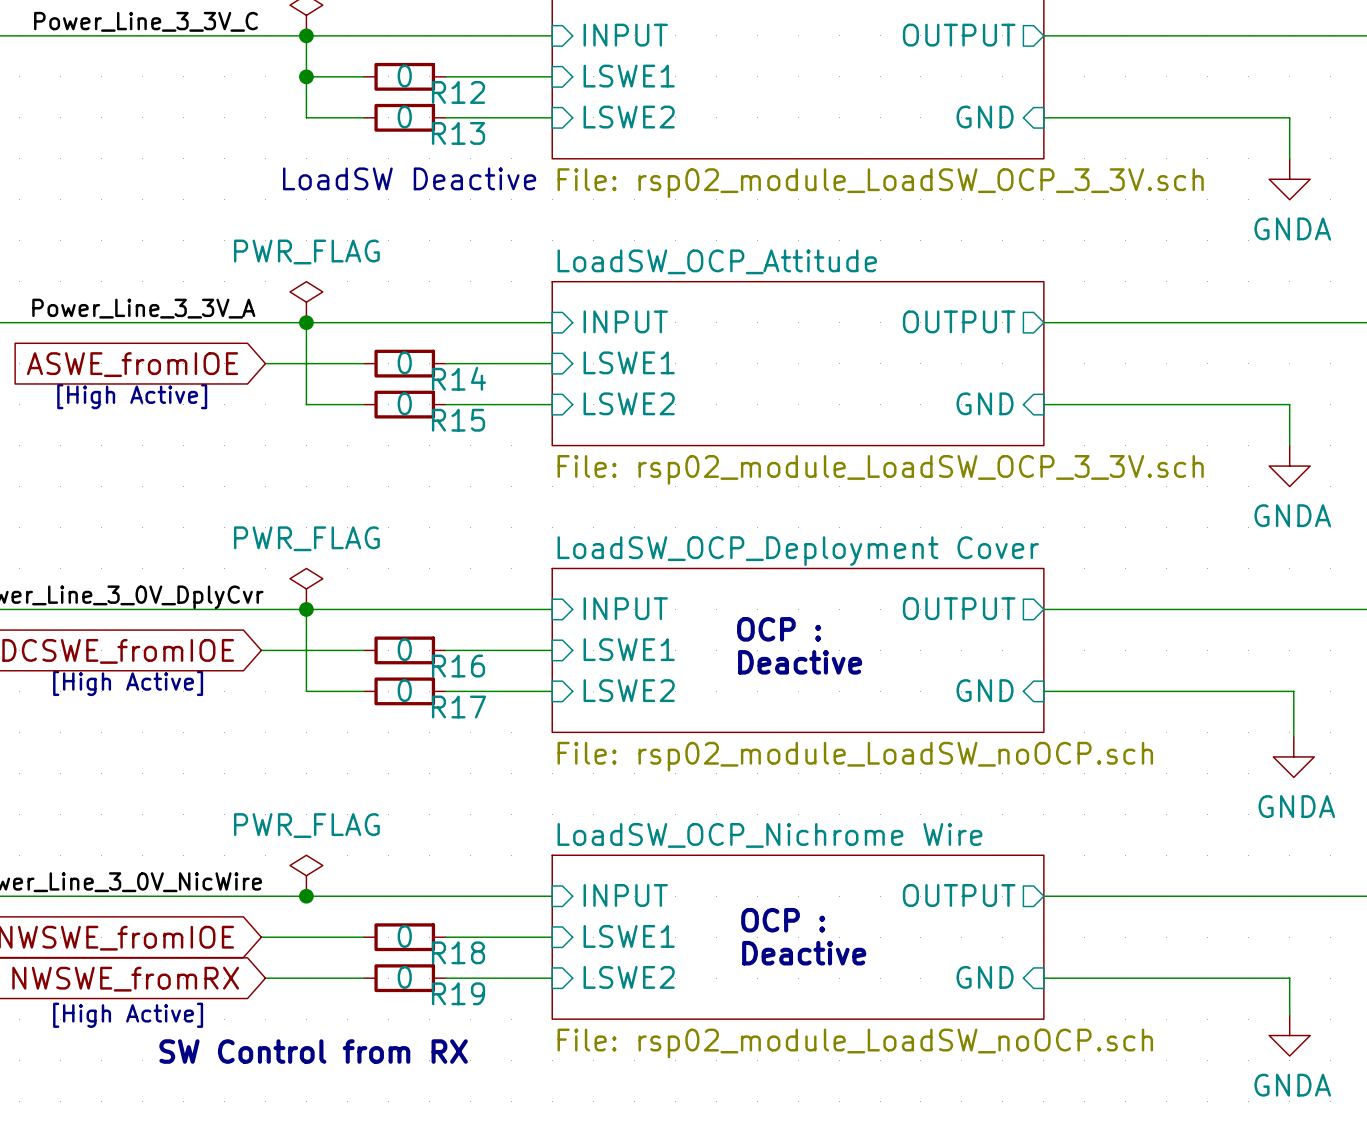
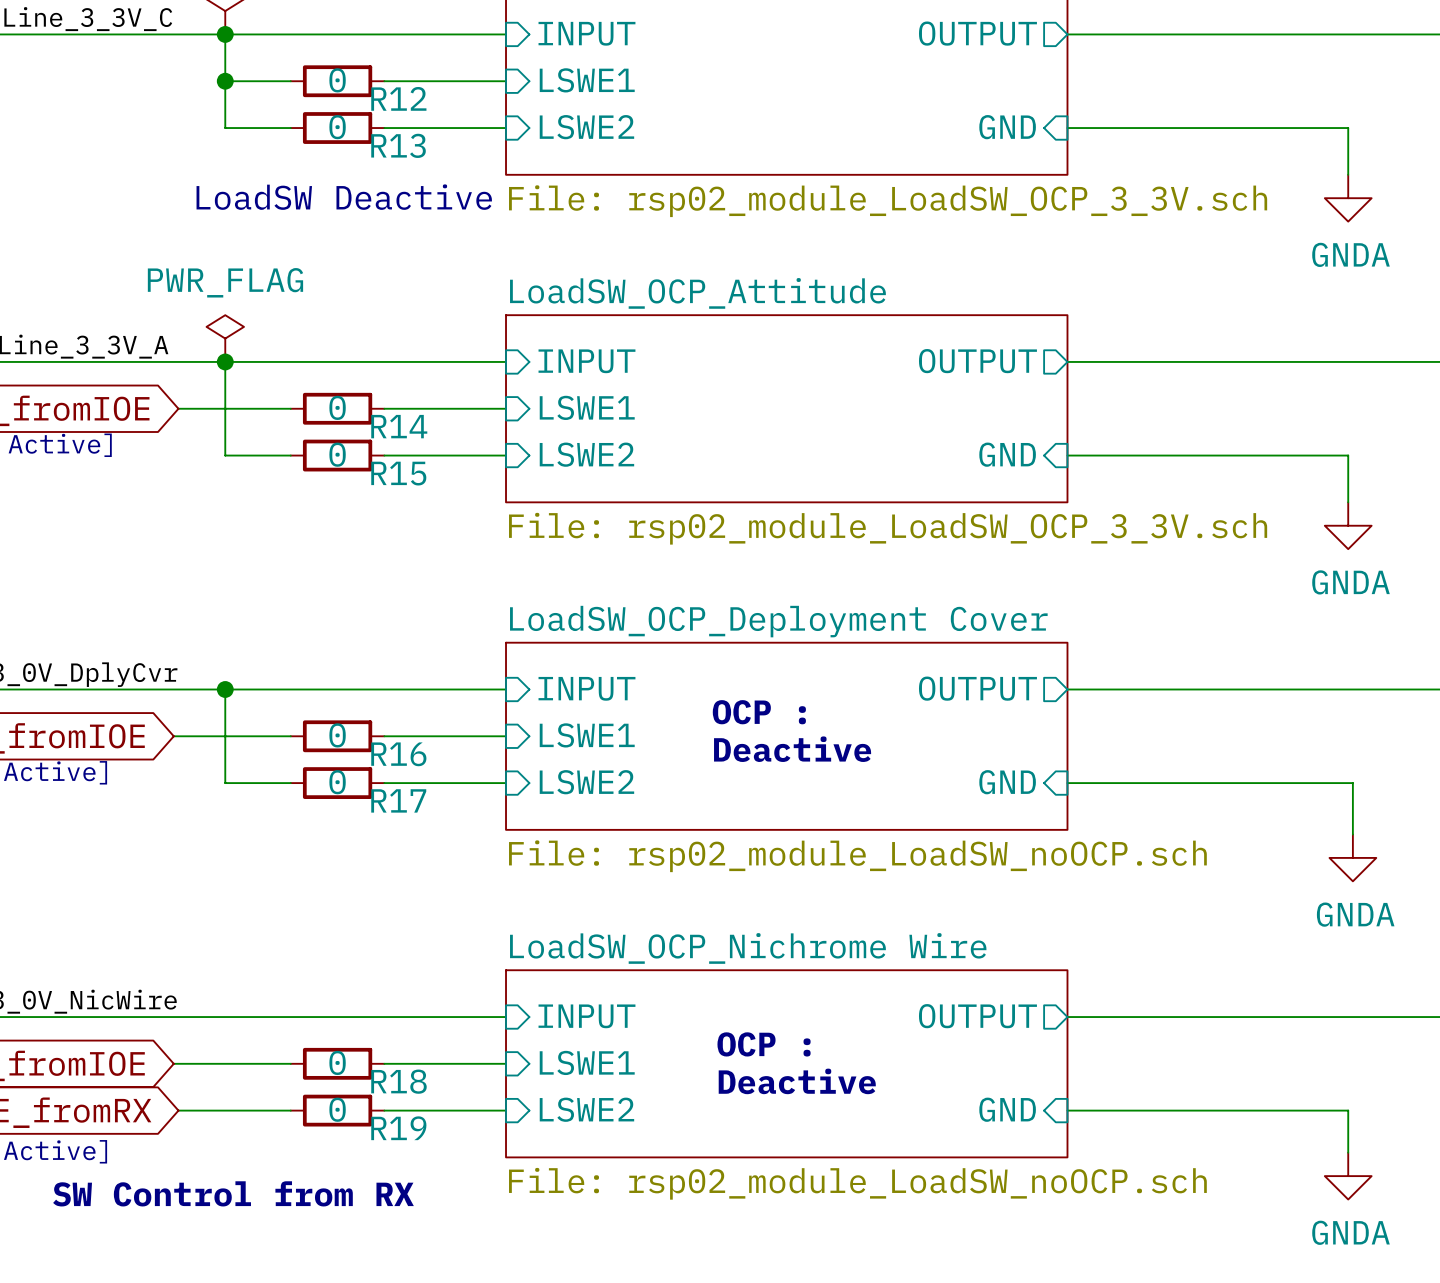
power symbol: PWR_FLAG (306, 588) -> none
power symbol: PWR_FLAG (306, 875) -> none
junction: (306, 896) -> none

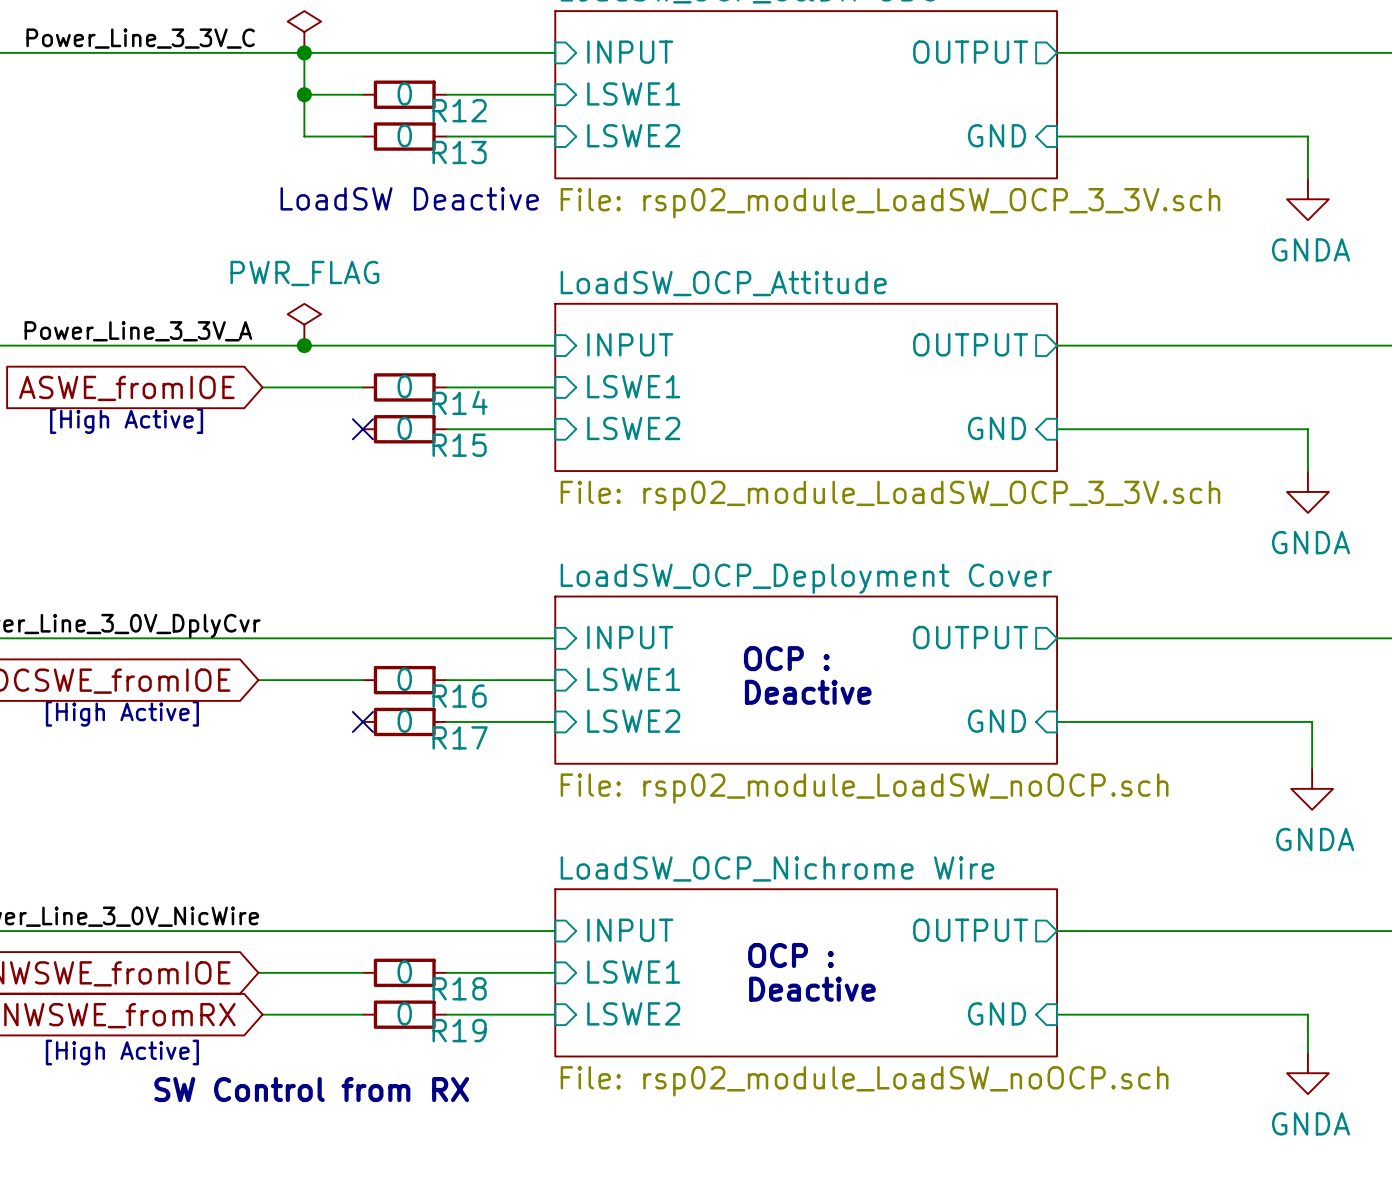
wire: (225, 361) (225, 455) (290, 455) -> none
no-connect mark: none -> (362, 429)
wire: (225, 689) (225, 783) (290, 783) -> none
junction: (225, 689) -> none
no-connect mark: none -> (362, 721)

